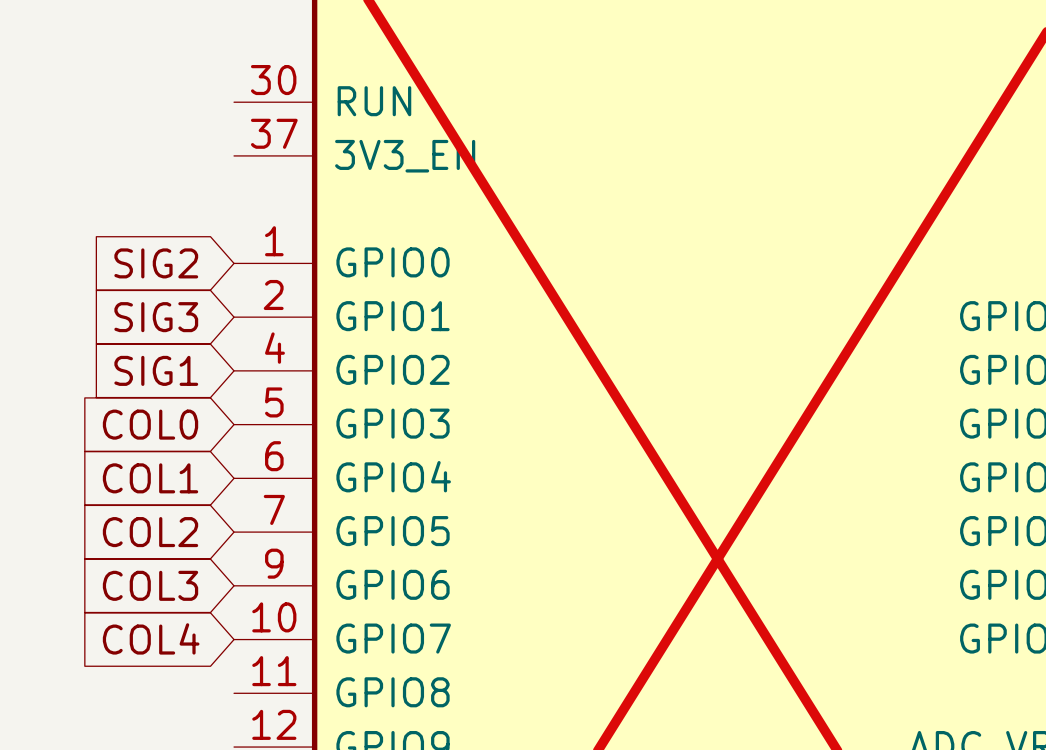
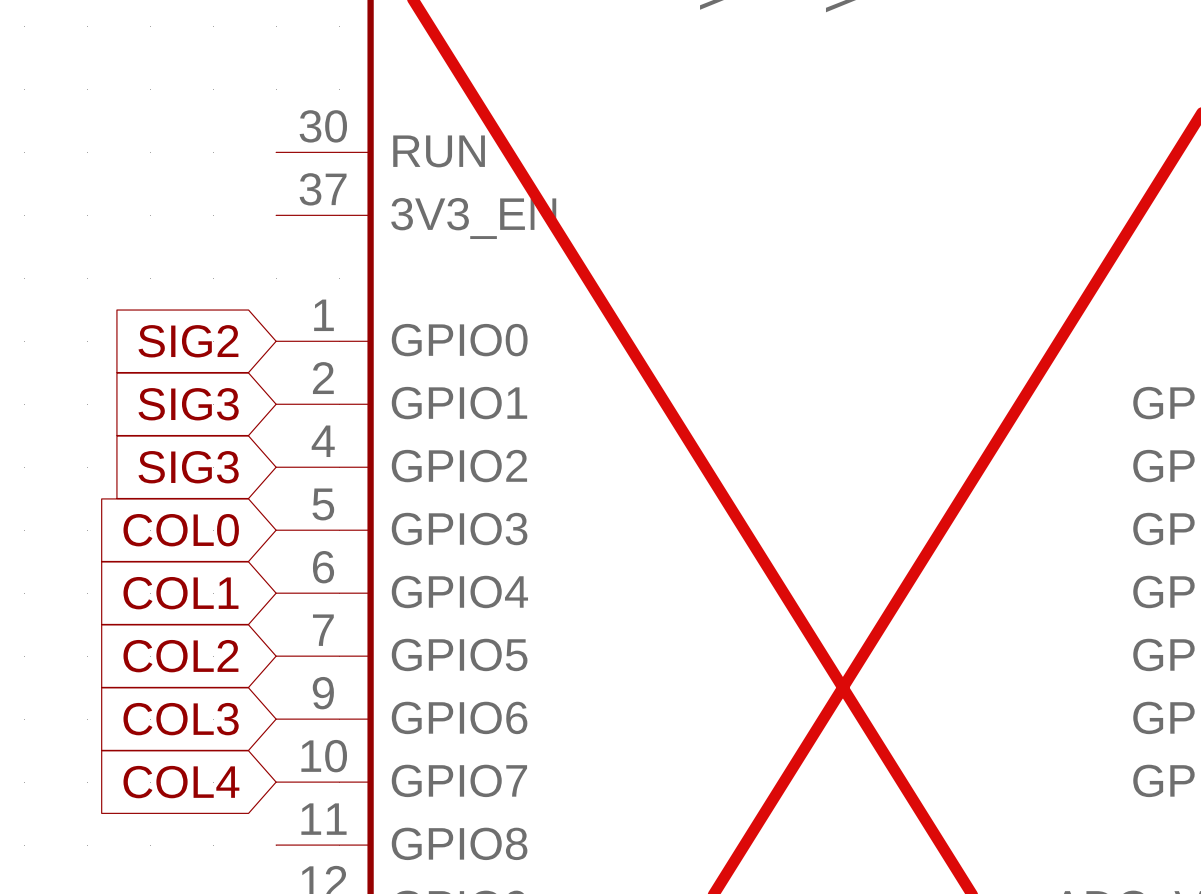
global label: SIG1 (156, 370) -> SIG3 (188, 467)

